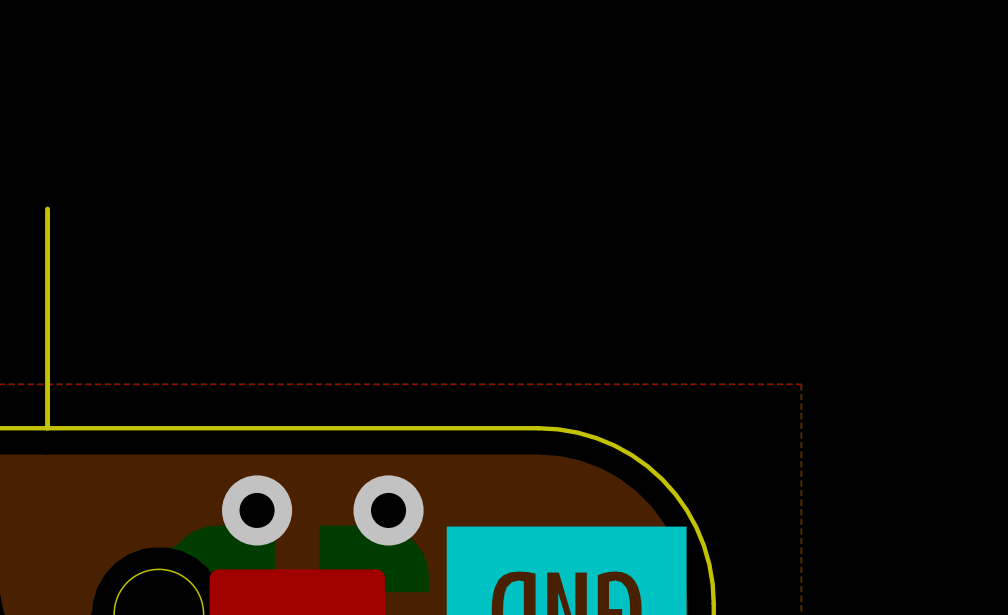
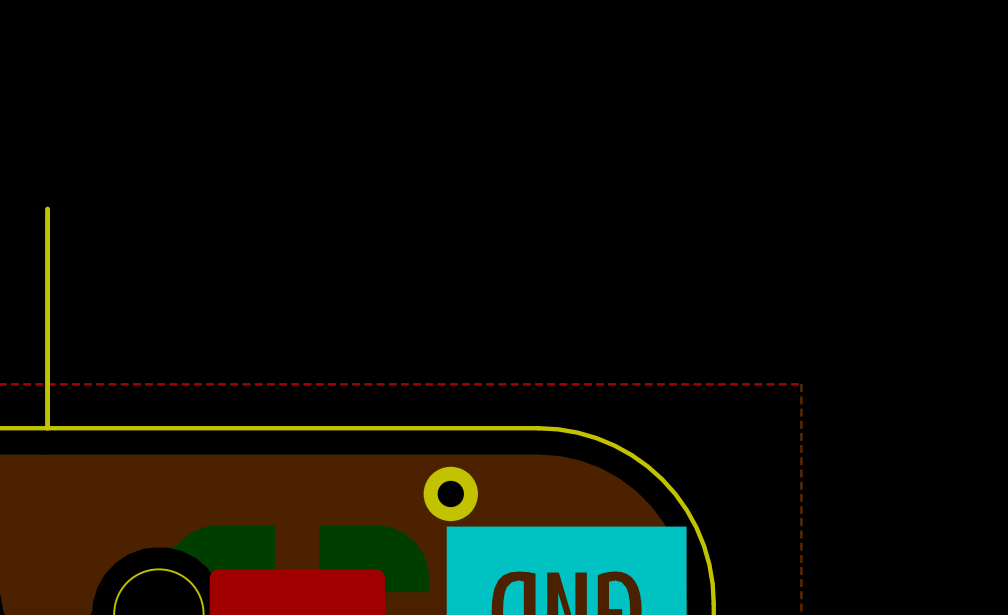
part: none -> (450, 493)
via: (257, 510) -> none
via: (388, 510) -> none

